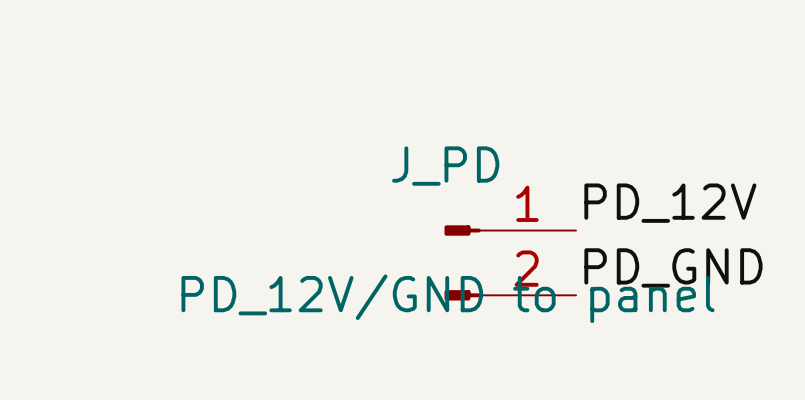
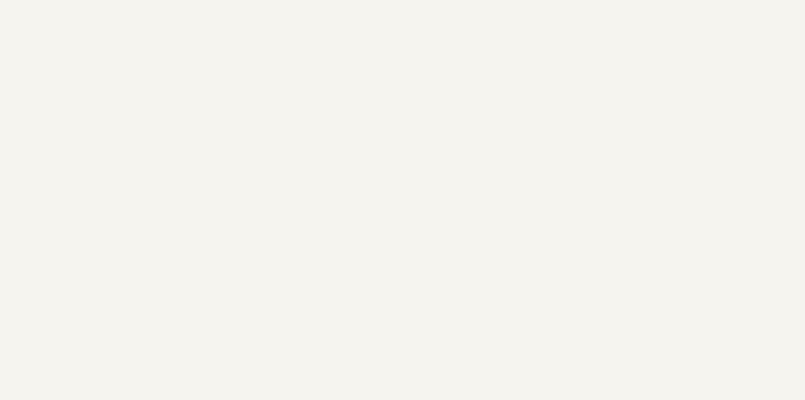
label: PD_12V (670, 203) -> none
J_PD: PD_12V/GND to panel (510, 262) -> none
label: PD_GND (673, 267) -> none

